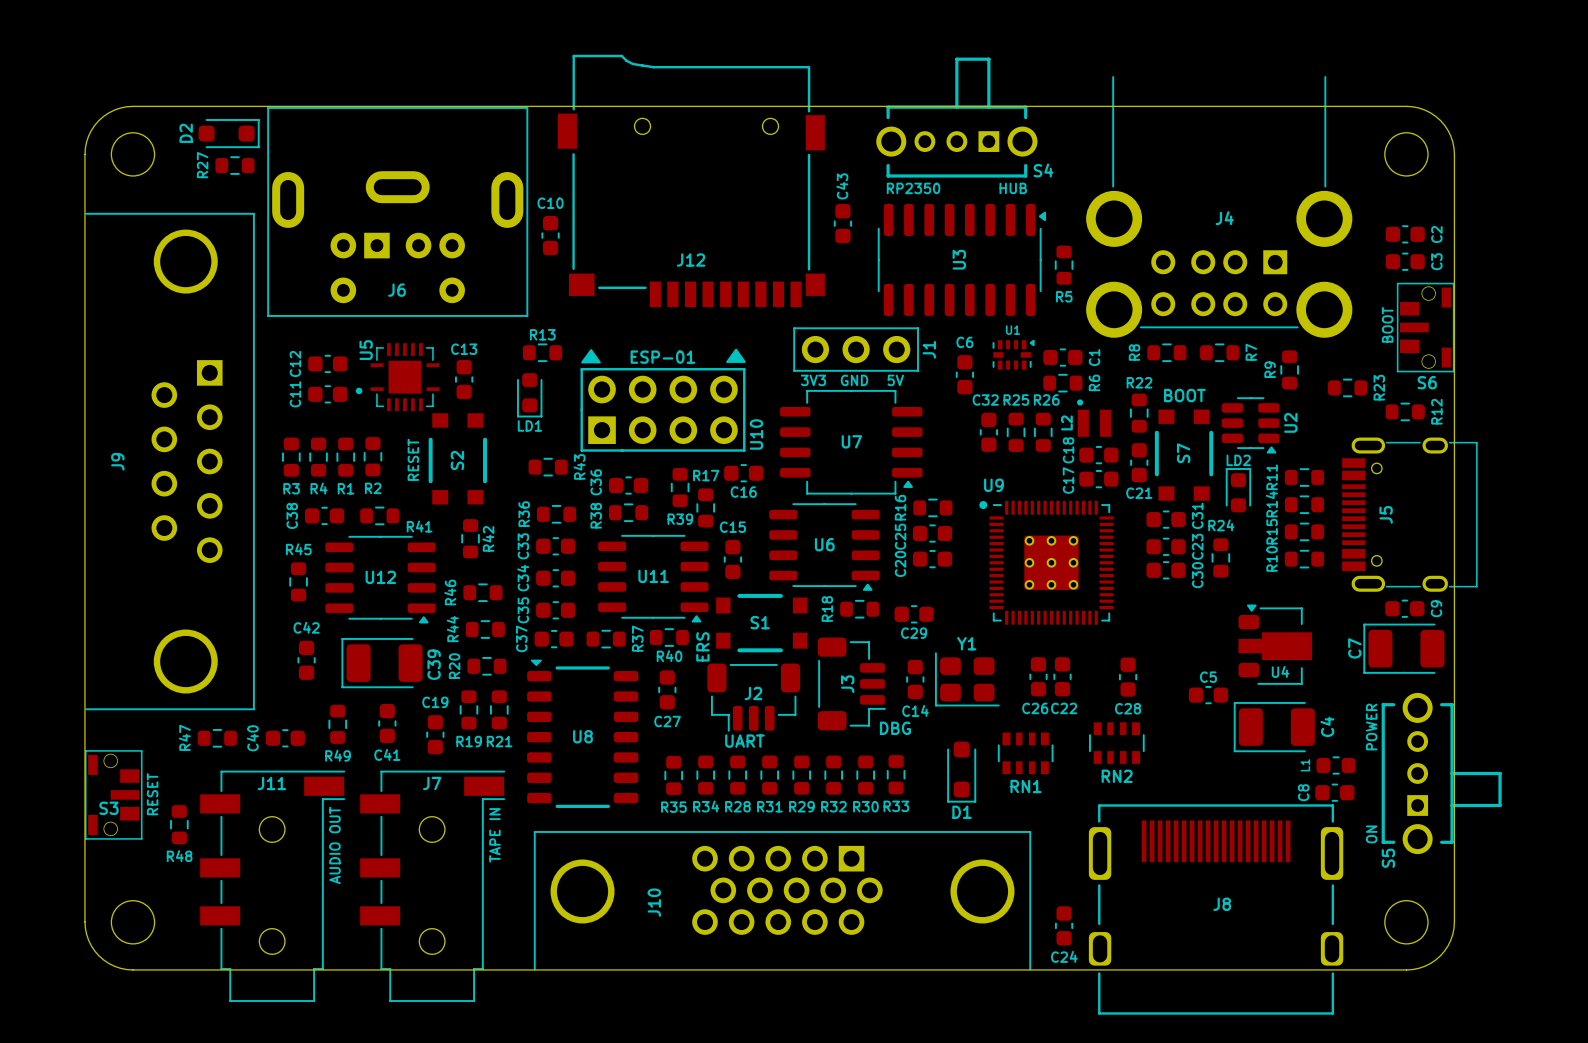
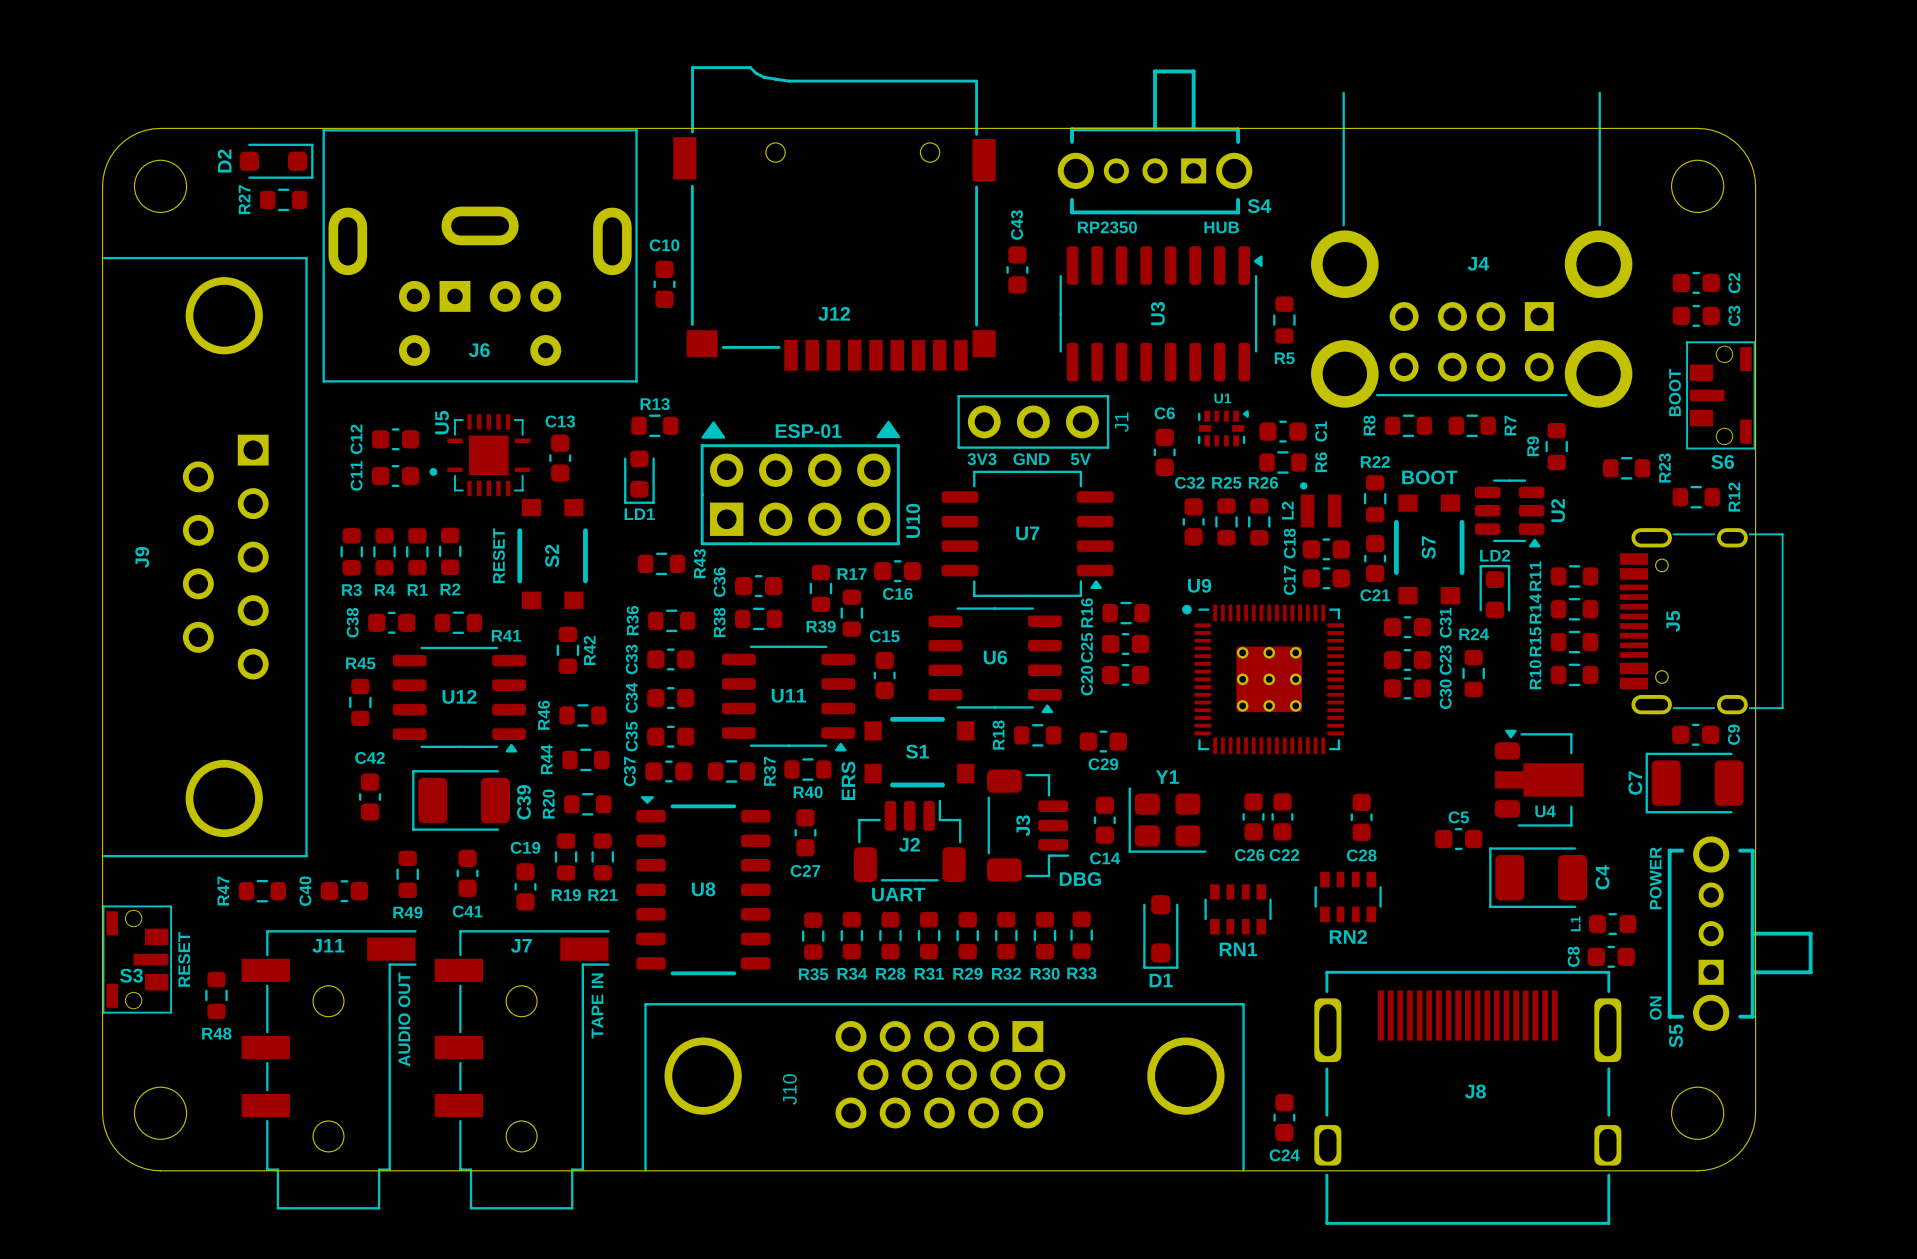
J2 rotation: 0° (753, 697) -> 180° (909, 840)

